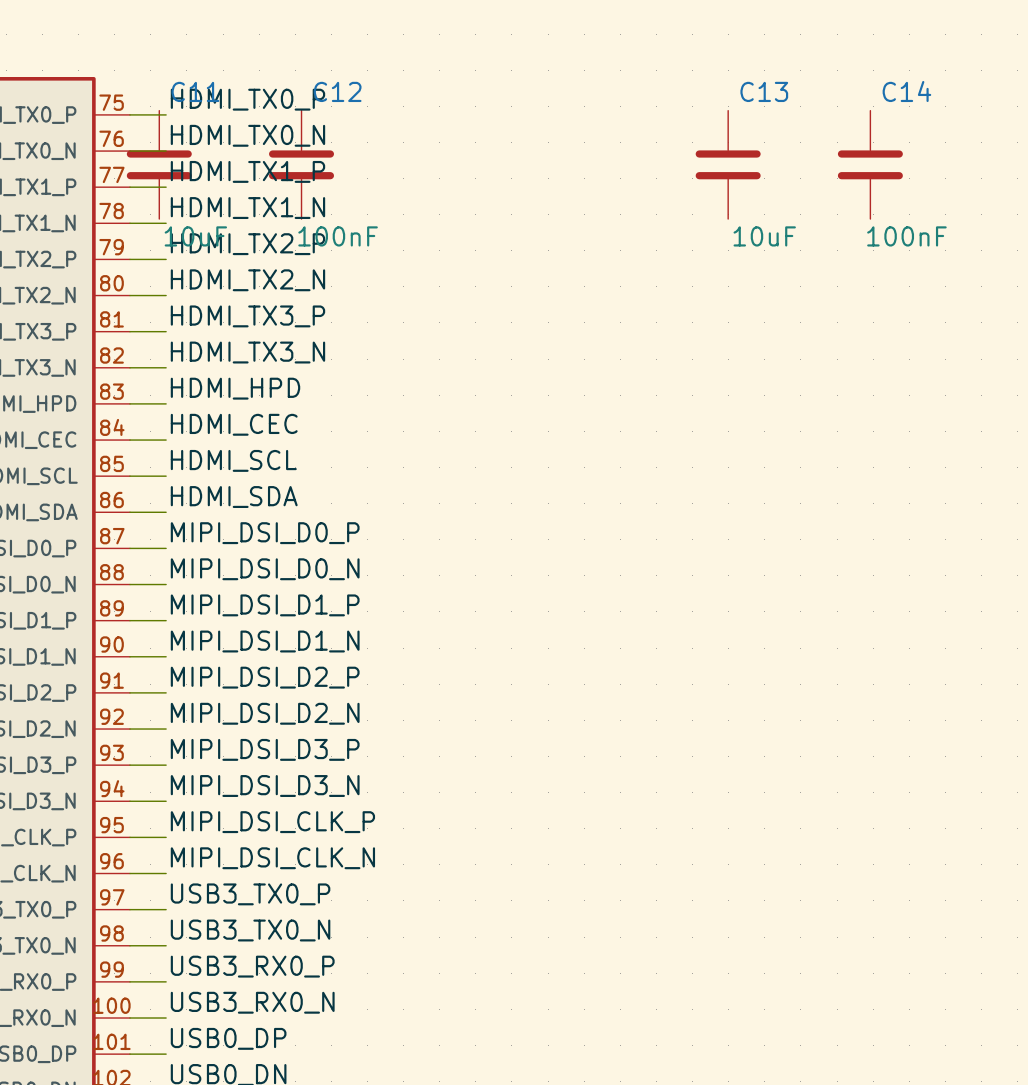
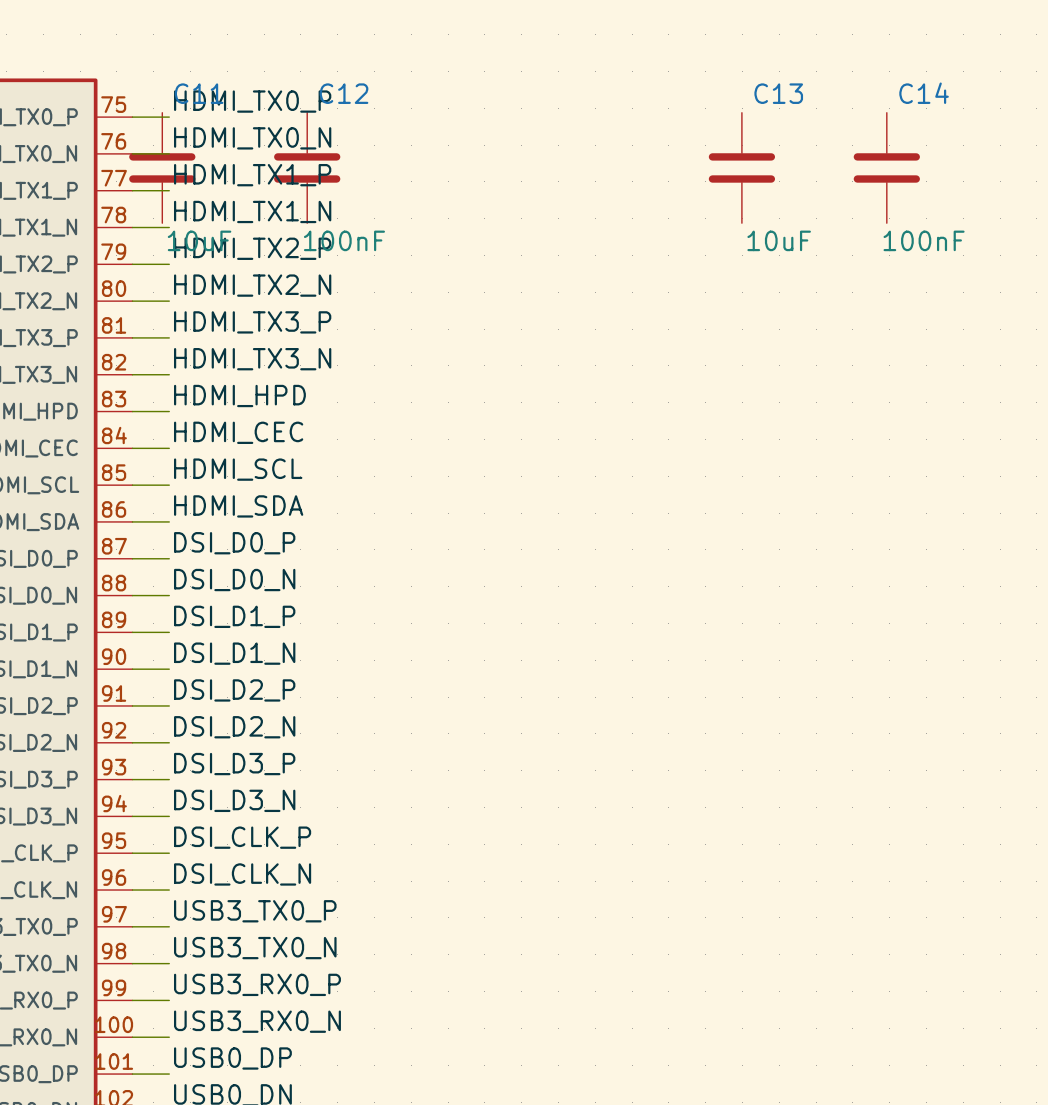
label: MIPI_DSI_D0_P (265, 533) -> DSI_D0_P (234, 543)
label: MIPI_DSI_D0_N (265, 569) -> DSI_D0_N (234, 580)
label: MIPI_DSI_D1_P (265, 605) -> DSI_D1_P (234, 616)
label: MIPI_DSI_D1_N (265, 641) -> DSI_D1_N (234, 653)
label: MIPI_DSI_D2_P (265, 677) -> DSI_D2_P (234, 690)
label: MIPI_DSI_D2_N (265, 713) -> DSI_D2_N (234, 727)
label: MIPI_DSI_D3_P (265, 749) -> DSI_D3_P (234, 764)
label: MIPI_DSI_D3_N (265, 786) -> DSI_D3_N (234, 800)
label: MIPI_DSI_CLK_P (272, 822) -> DSI_CLK_P (242, 837)
label: MIPI_DSI_CLK_N (272, 858) -> DSI_CLK_N (242, 874)

